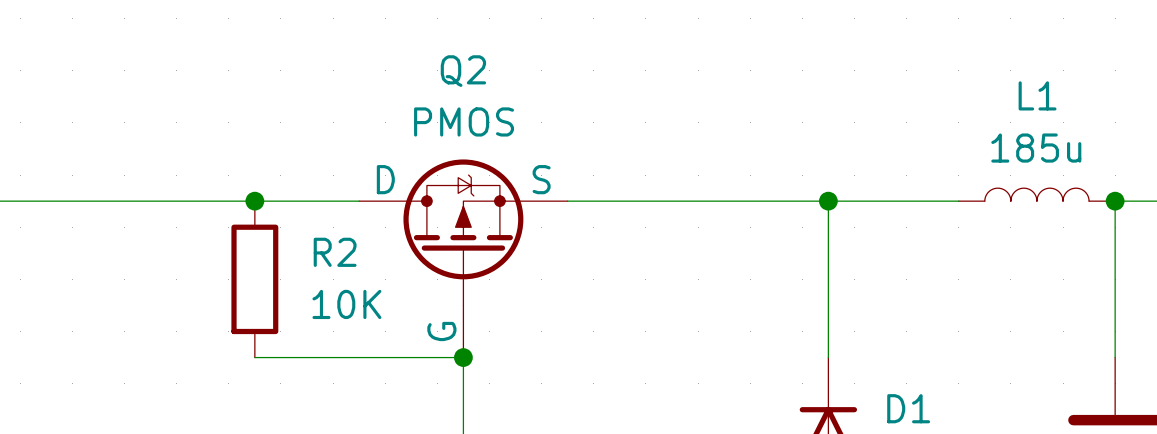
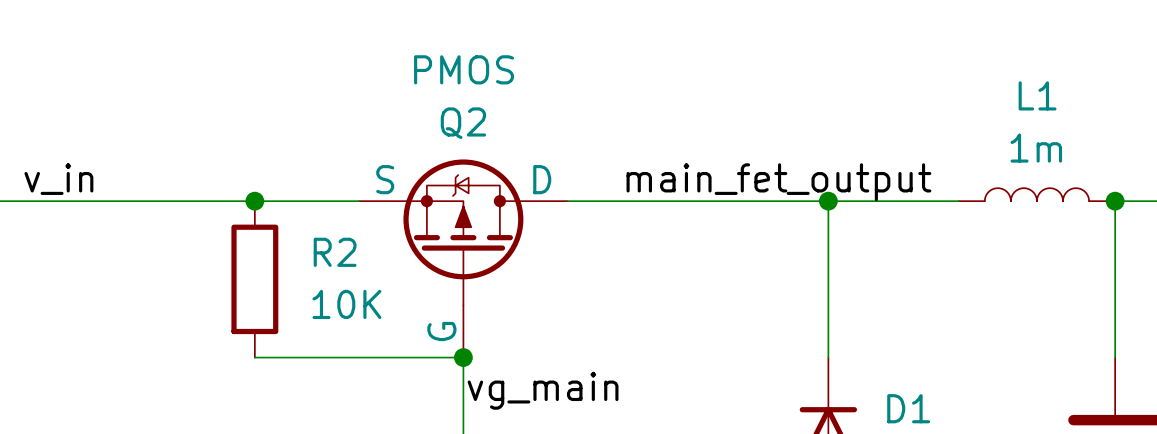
Q2 name position: Q2 (463, 71) -> Q2 (463, 123)
Q2 value position: PMOS (464, 121) -> PMOS (464, 69)
L1 value: 185u (1036, 148) -> 1m (1036, 148)
label: none -> v_in (58, 179)
label: none -> main_fet_output (778, 182)
Q2 flip: as is (463, 232) -> left-right (463, 232)
label: none -> vg_main (543, 390)

